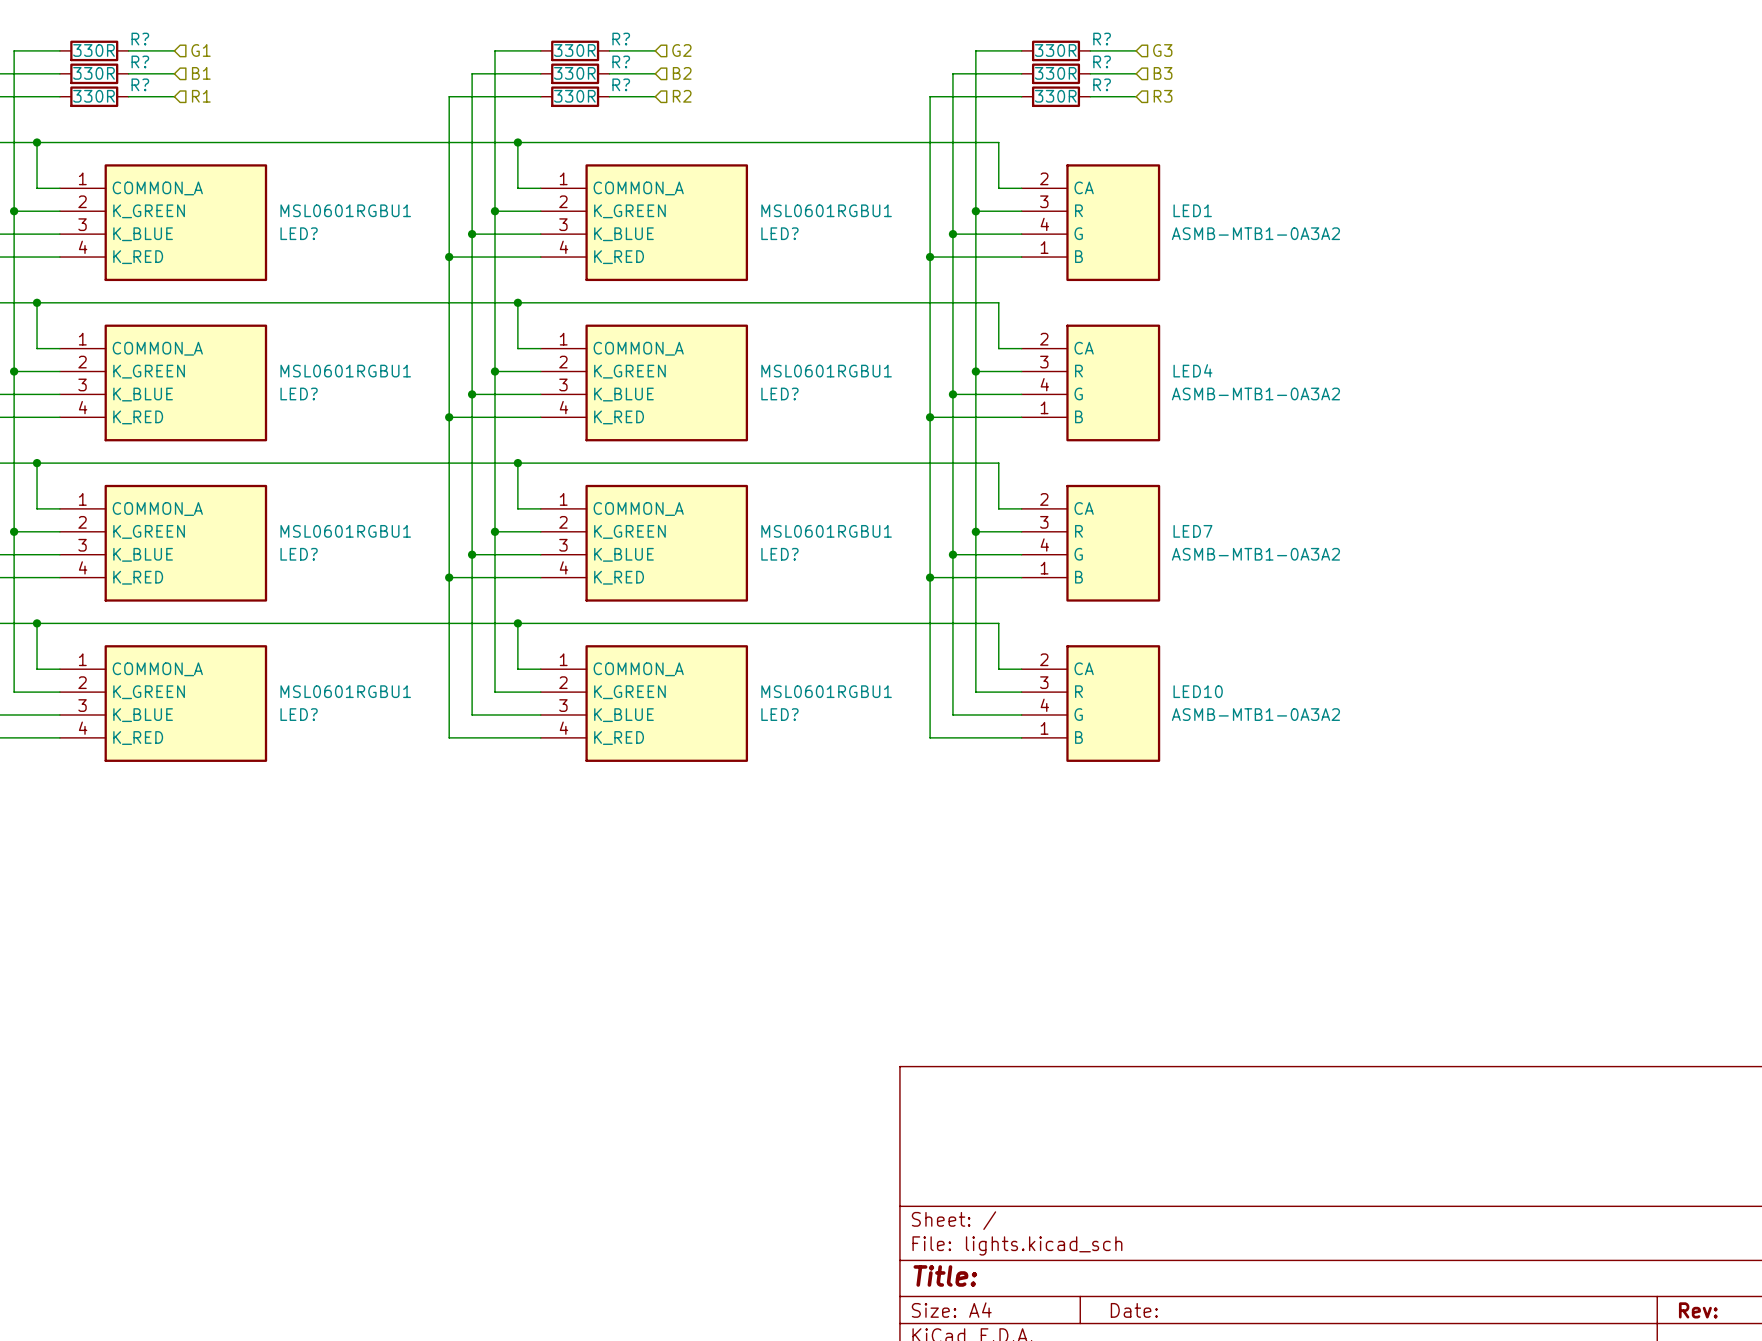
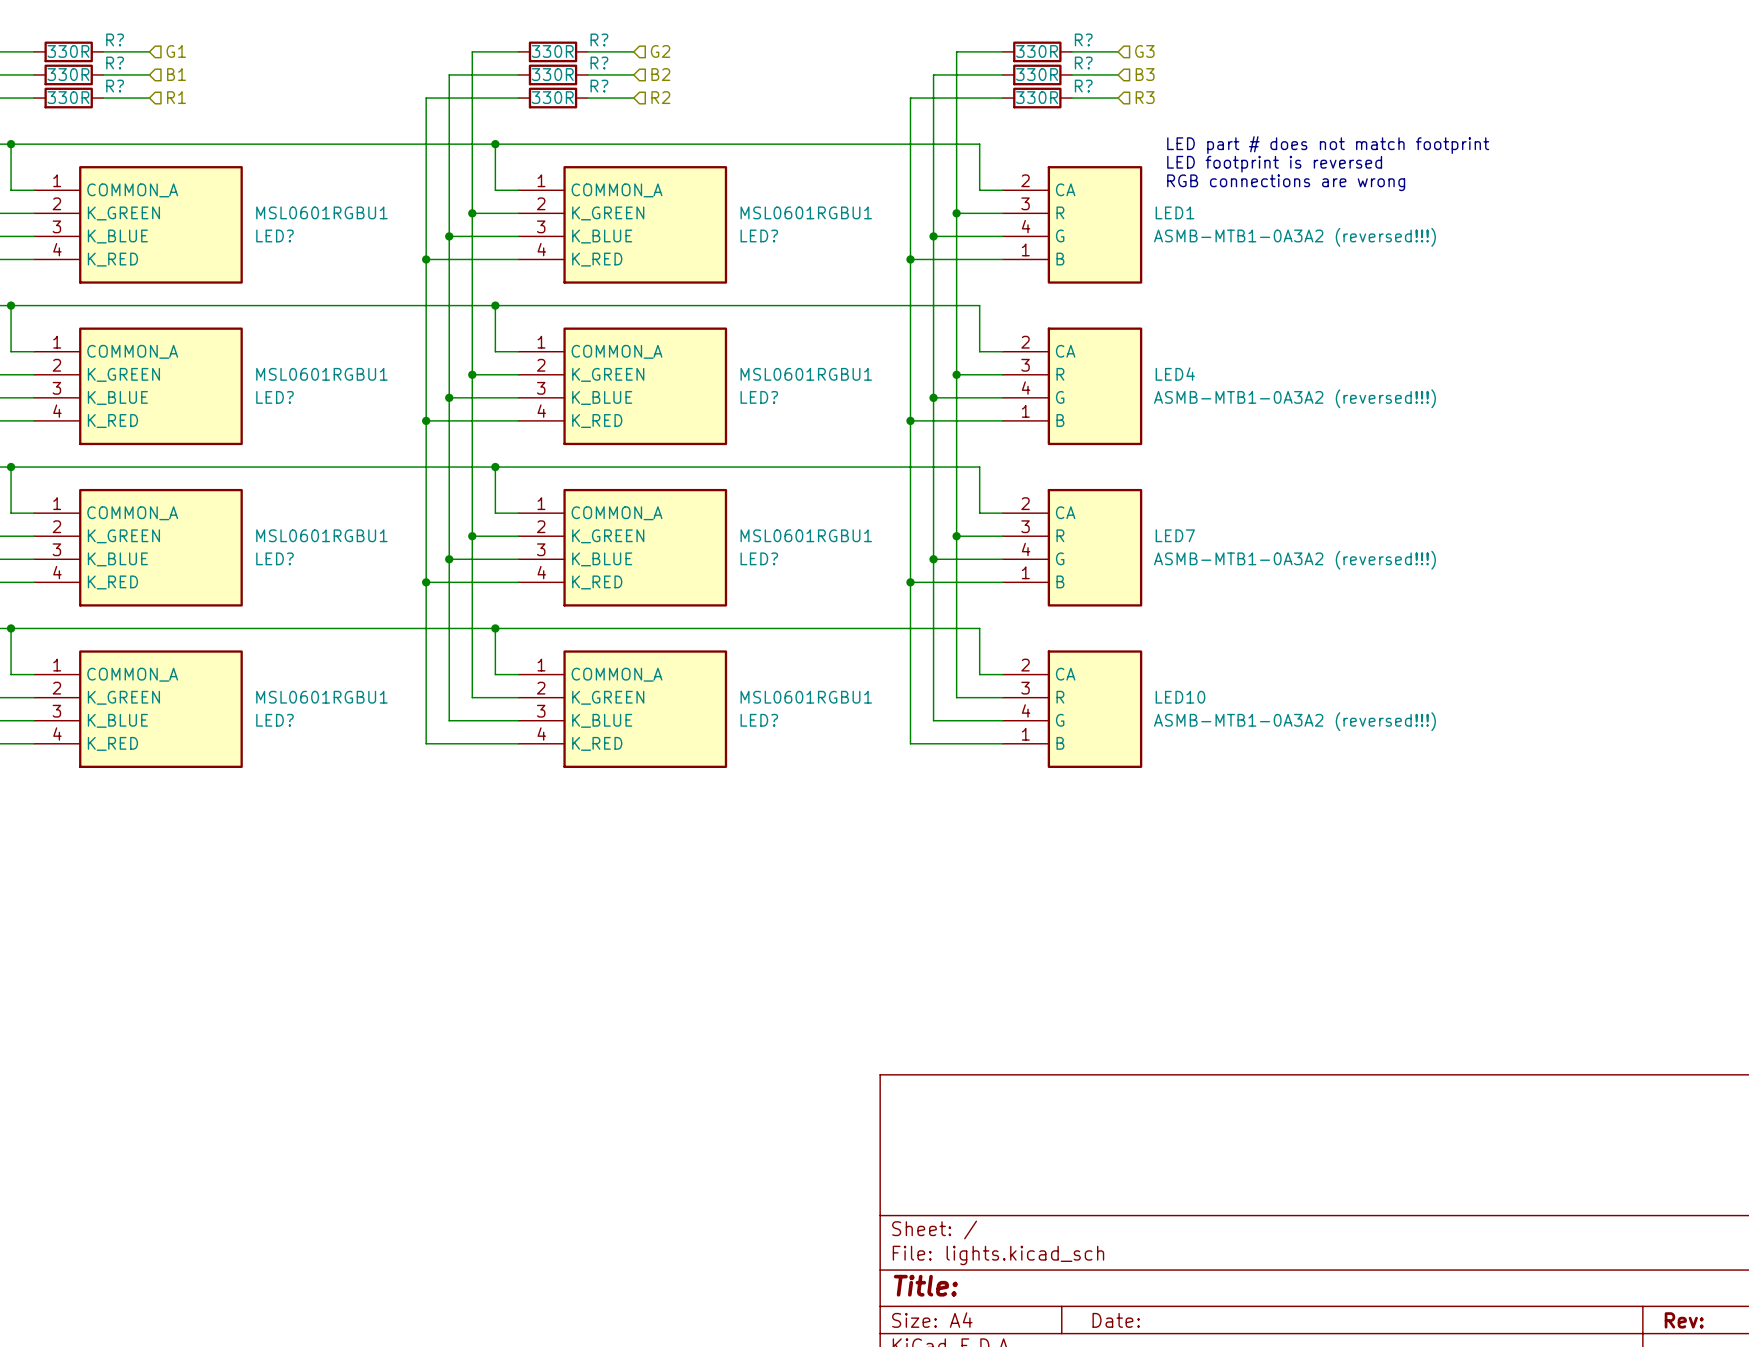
text: none -> LED part # does not match footprint (1328, 145)
text: none -> LED footprint is reversed (1274, 164)
text: none -> RGB connections are wrong (1286, 182)
LED1 value: ASMB-MTB1-0A3A2 (1255, 233) -> ASMB-MTB1-0A3A2 (reversed!!!) (1294, 237)
LED4 value: ASMB-MTB1-0A3A2 (1255, 393) -> ASMB-MTB1-0A3A2 (reversed!!!) (1294, 398)
LED7 value: ASMB-MTB1-0A3A2 (1255, 554) -> ASMB-MTB1-0A3A2 (reversed!!!) (1294, 560)
LED10 value: ASMB-MTB1-0A3A2 (1255, 714) -> ASMB-MTB1-0A3A2 (reversed!!!) (1294, 721)

